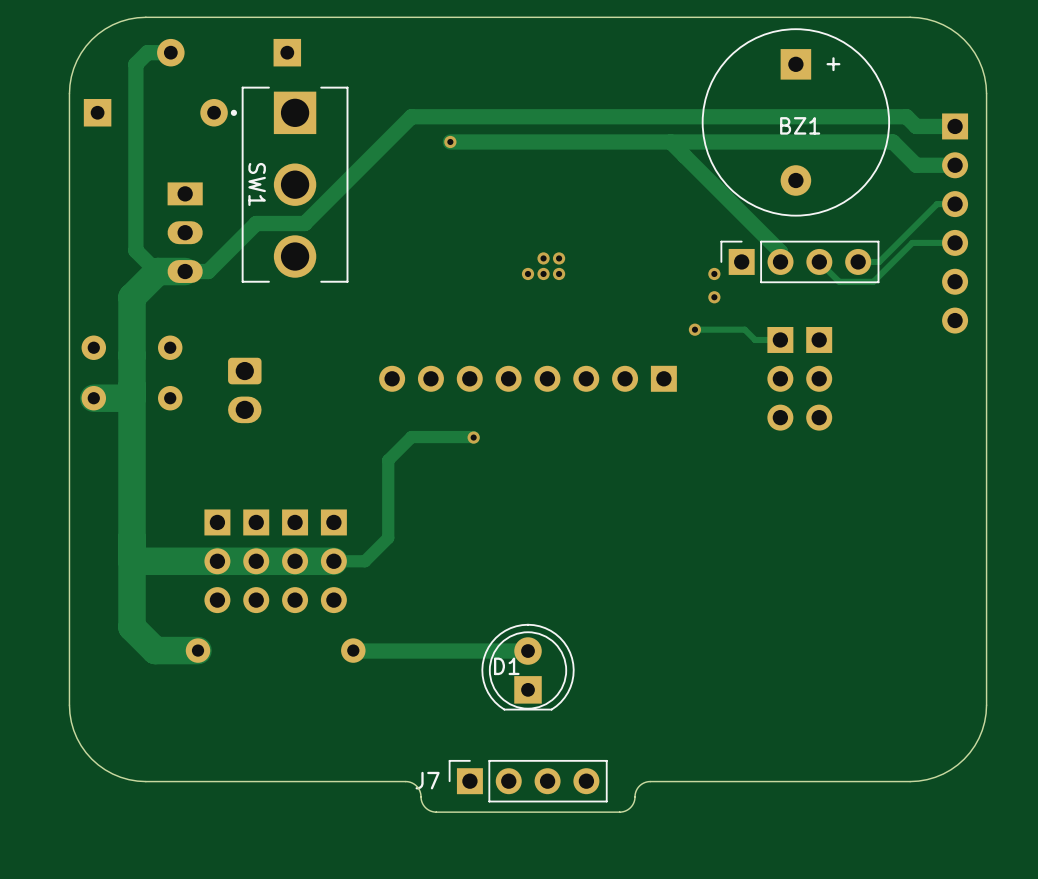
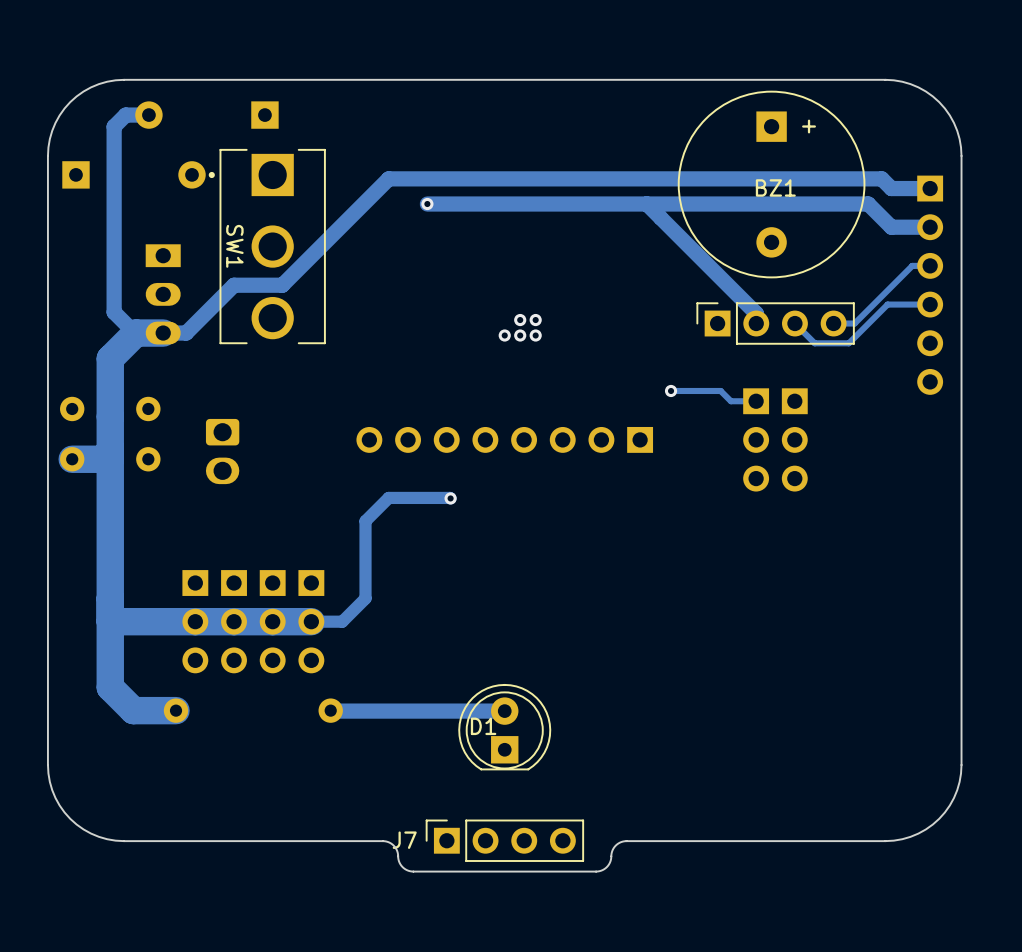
via: (714, 273) -> none
via: (714, 297) -> none

